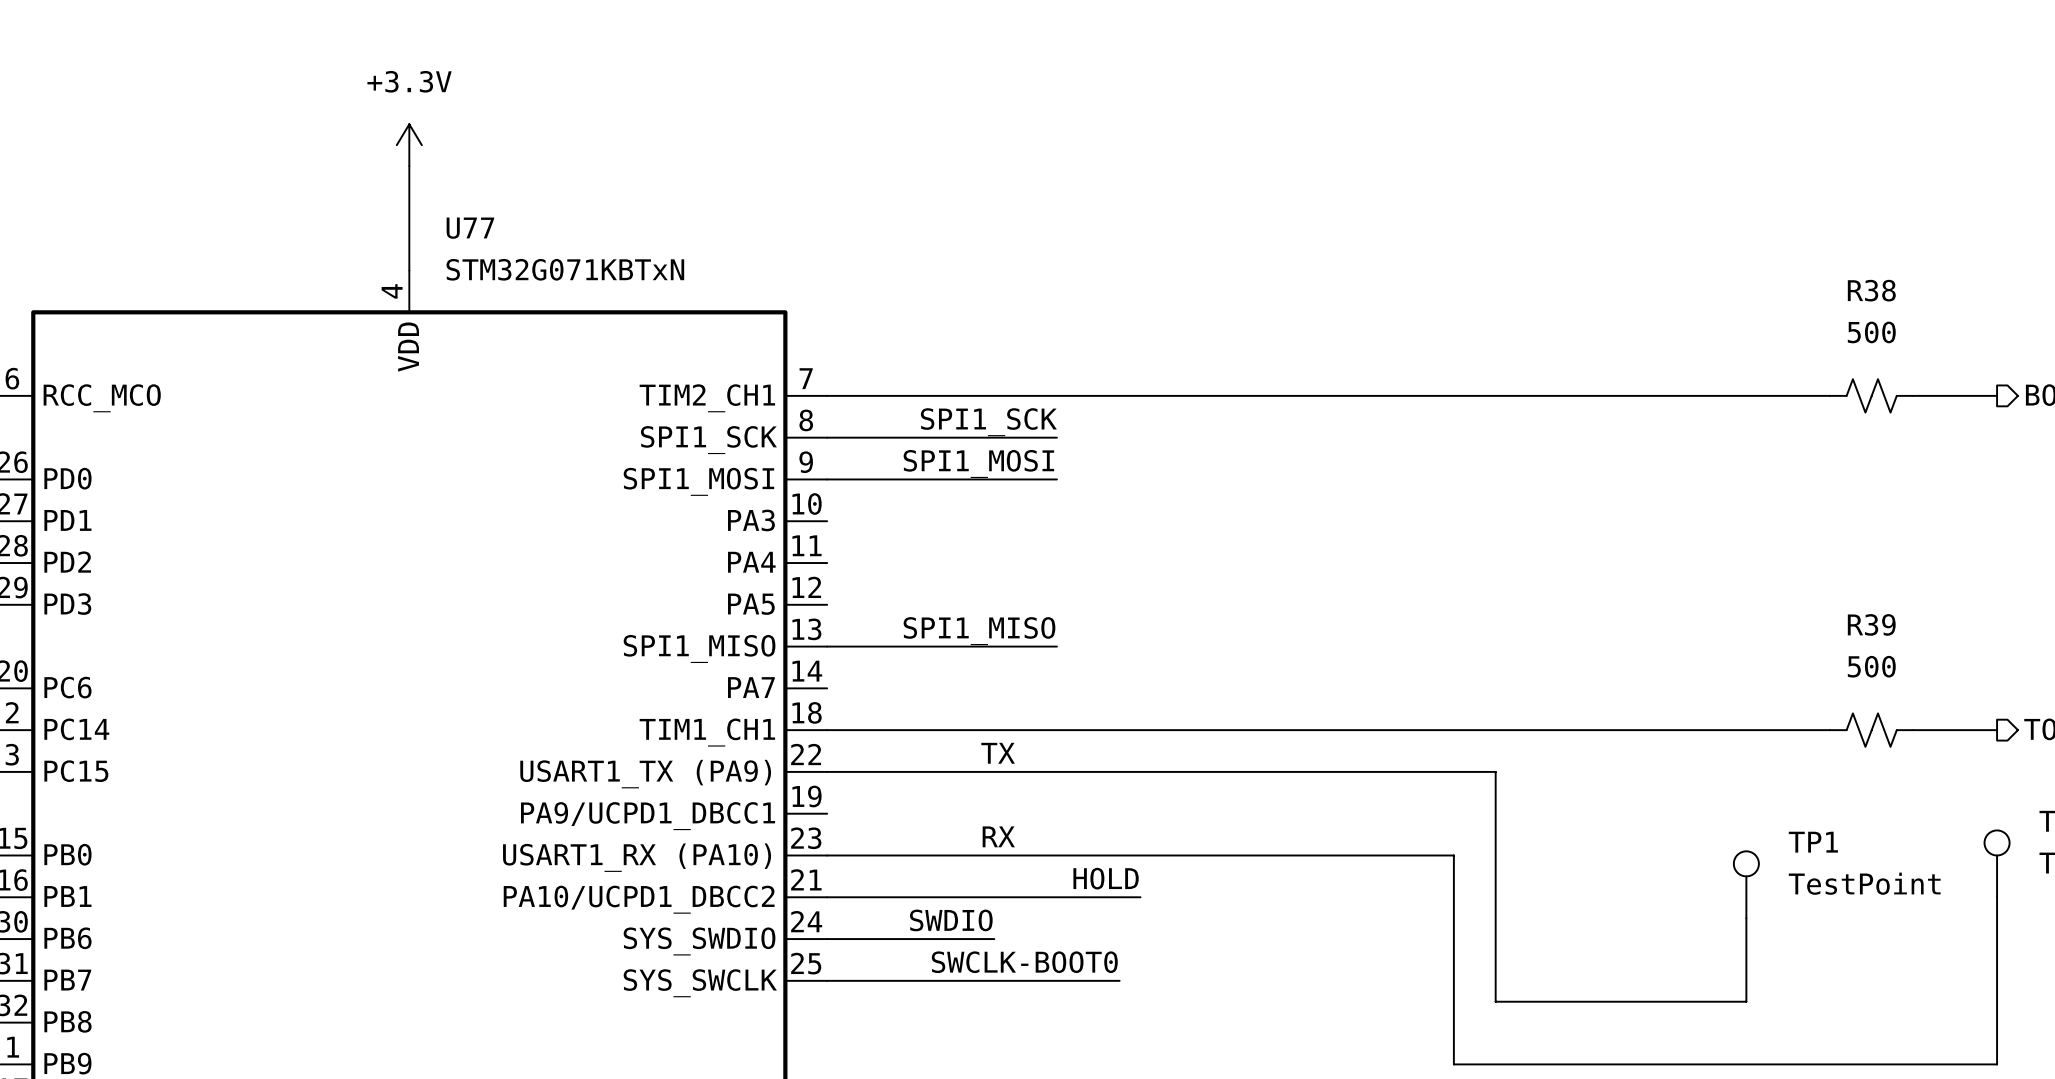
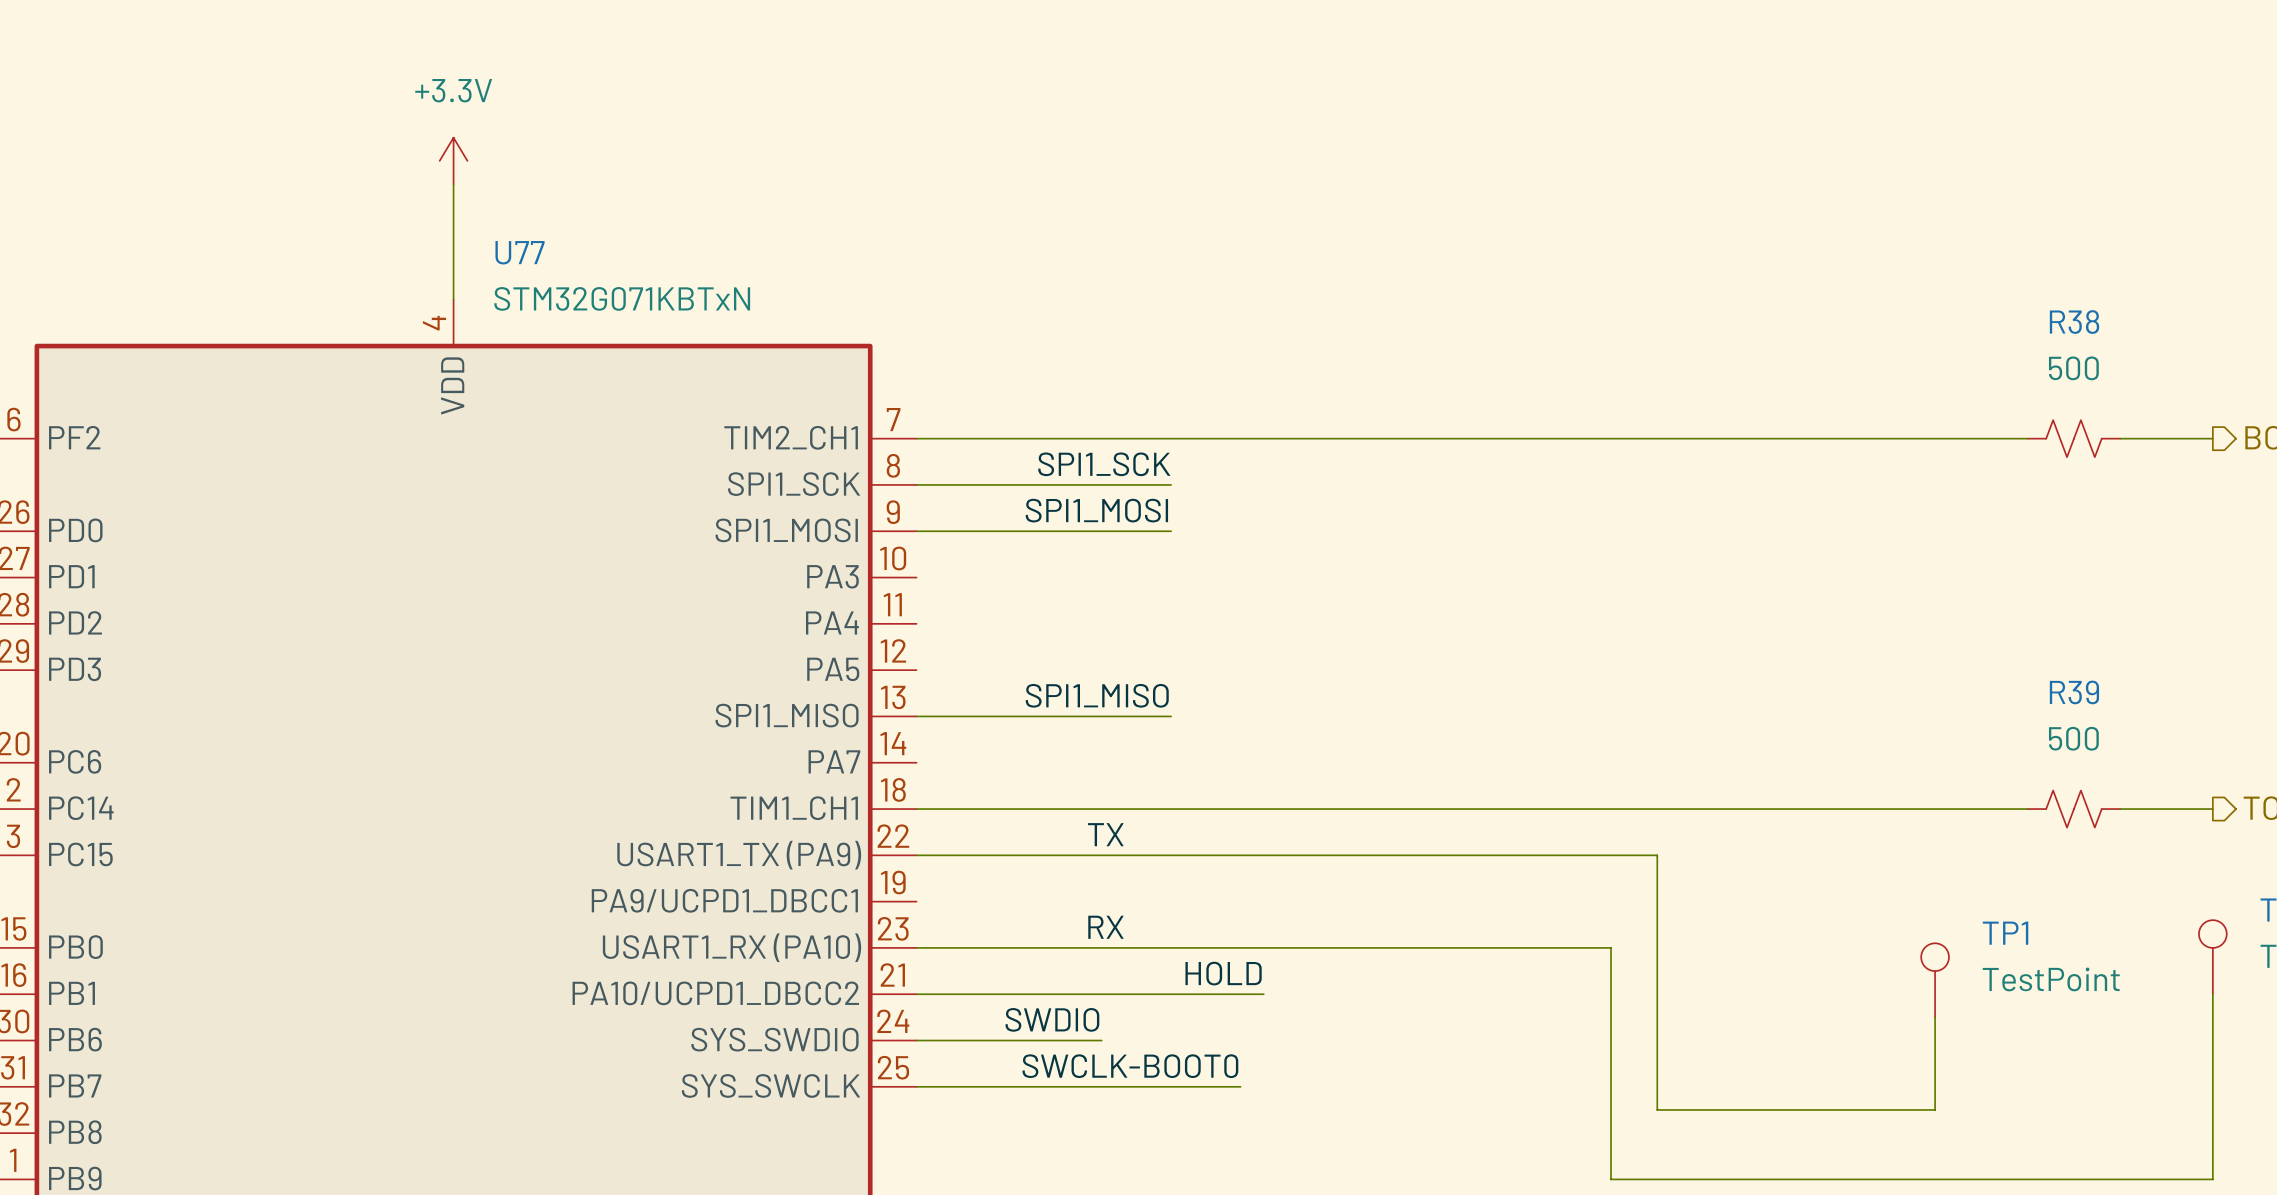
U77 pin name: RCC_MCO (102, 398) -> PF2 (74, 437)

